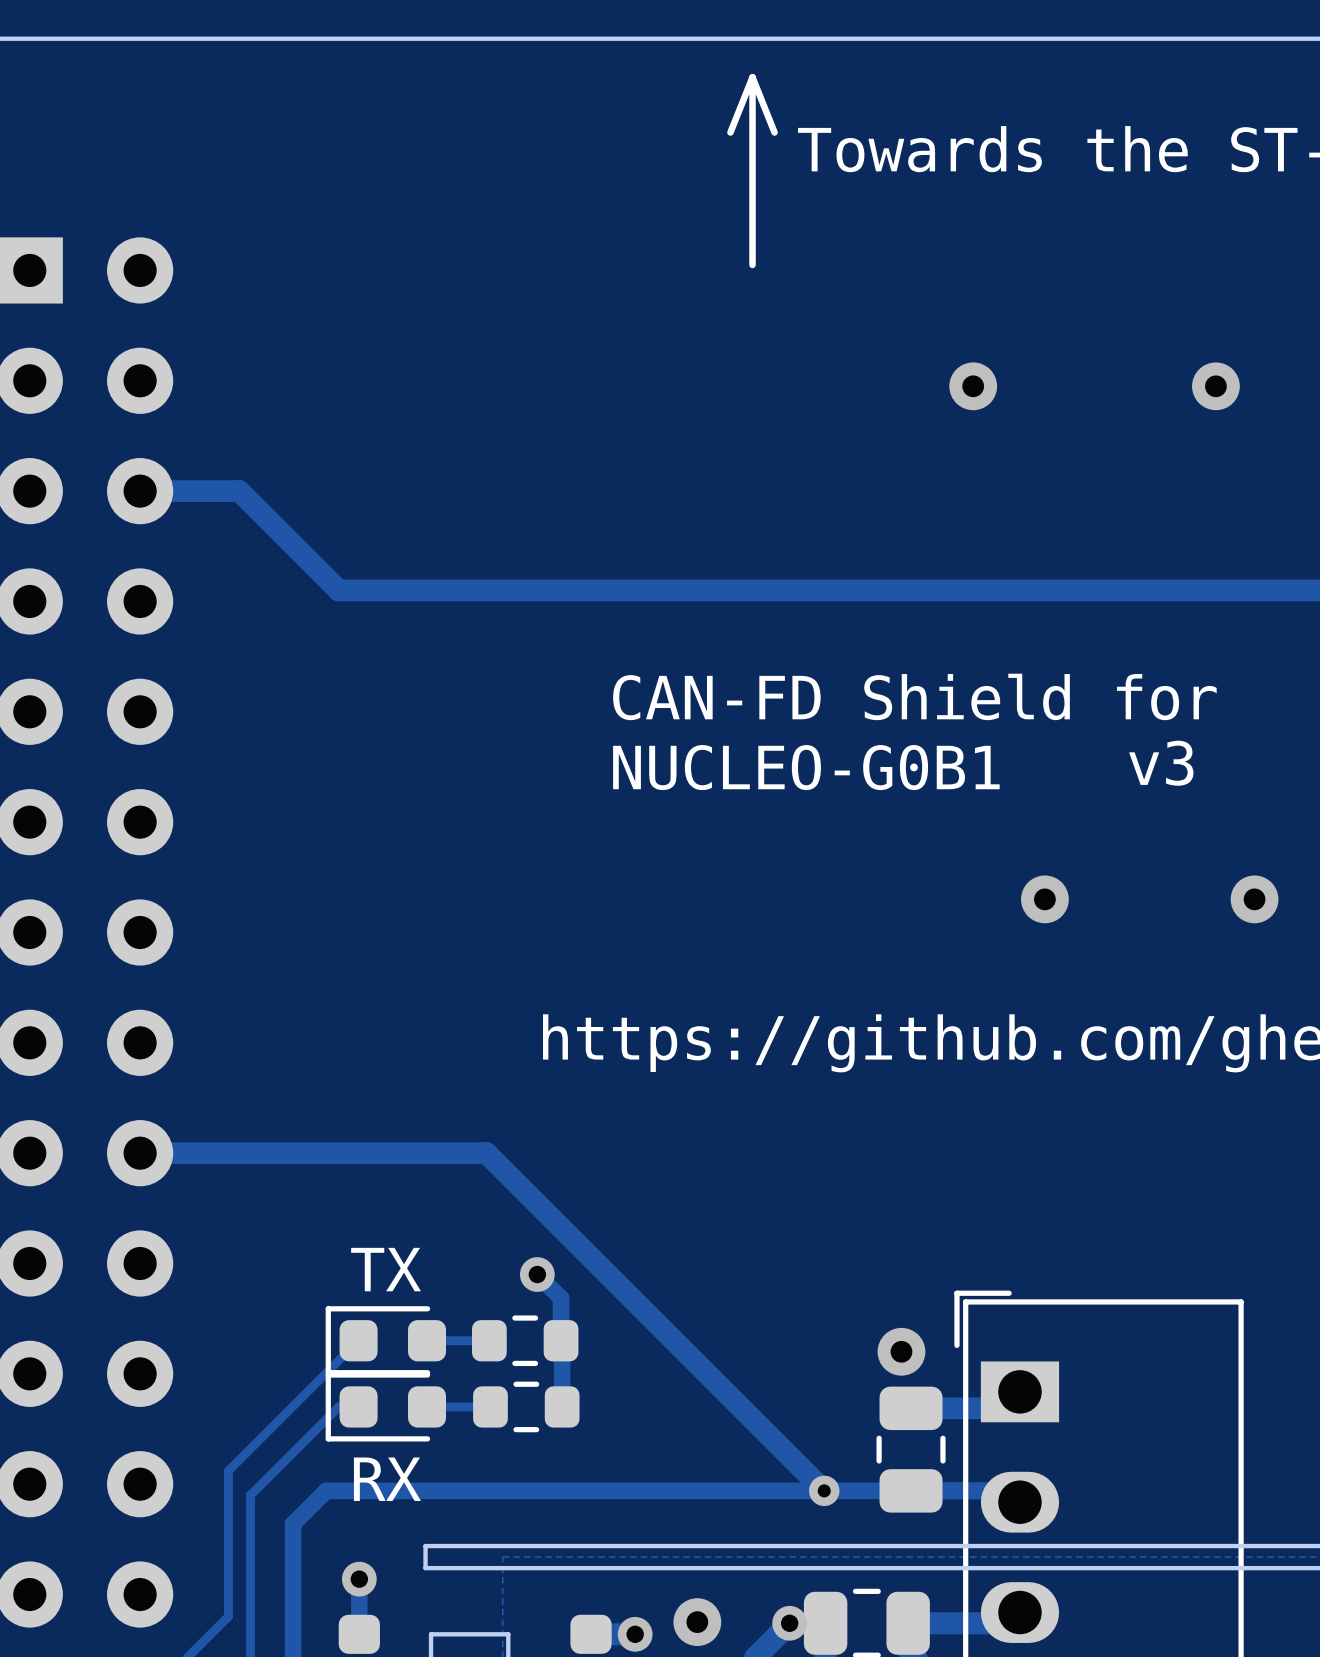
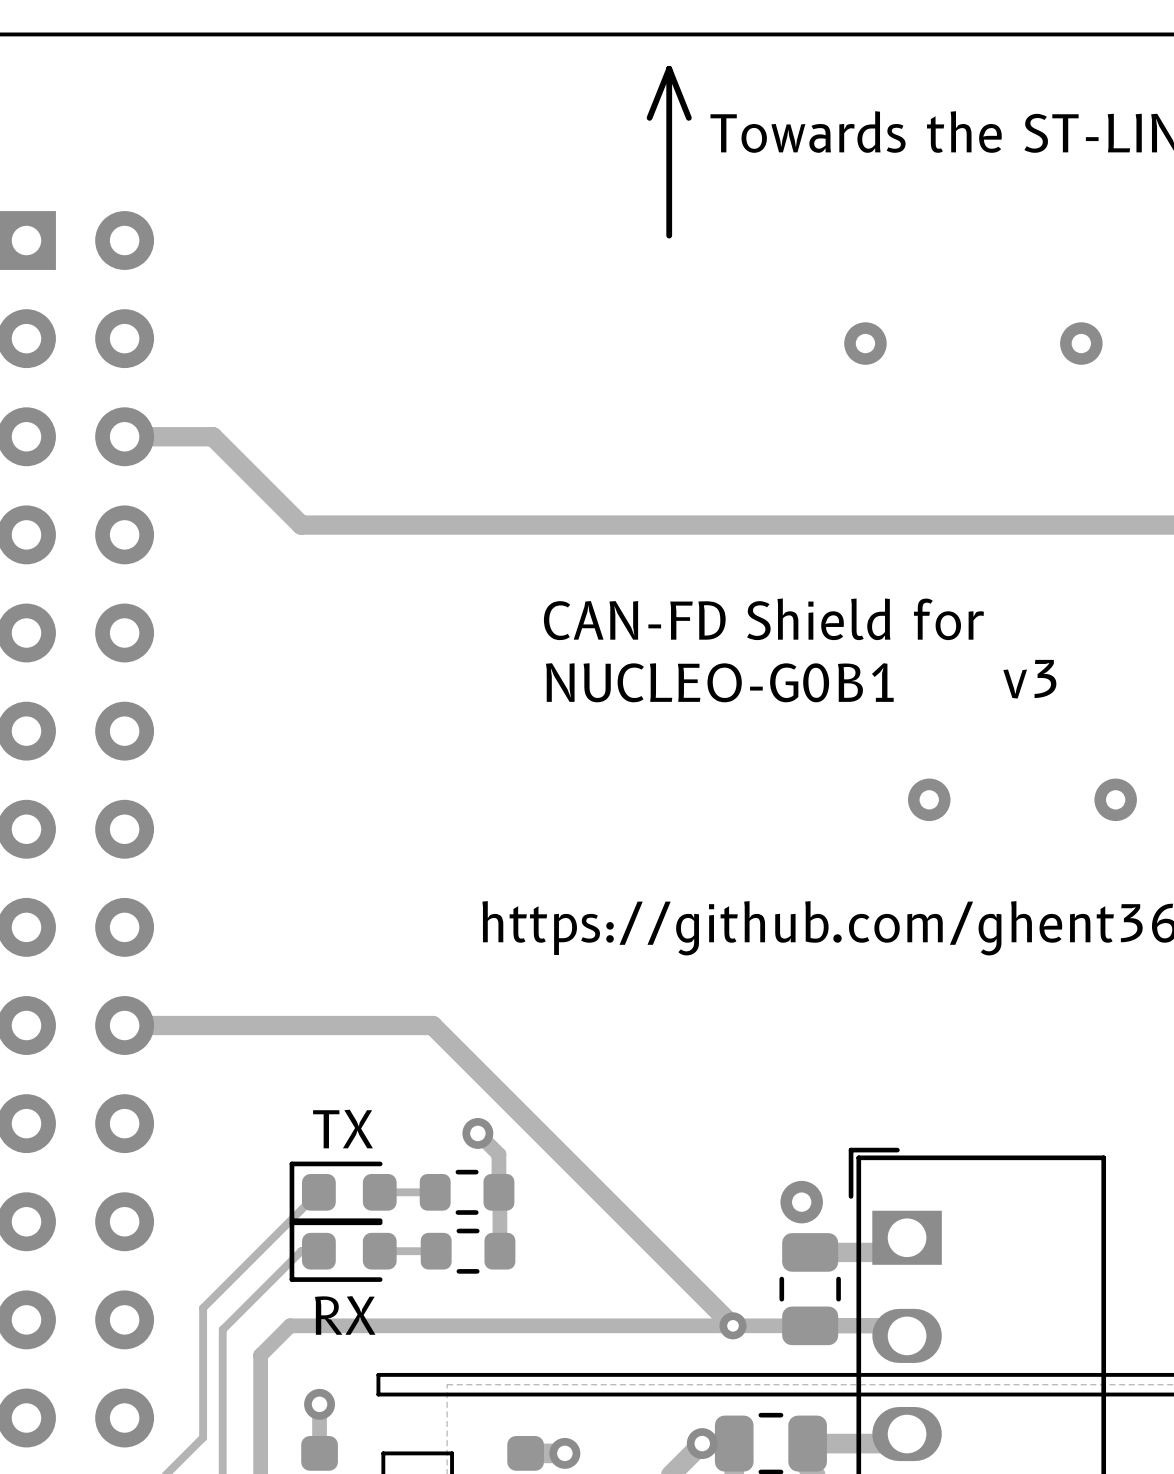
via: (697, 1622) -> none

